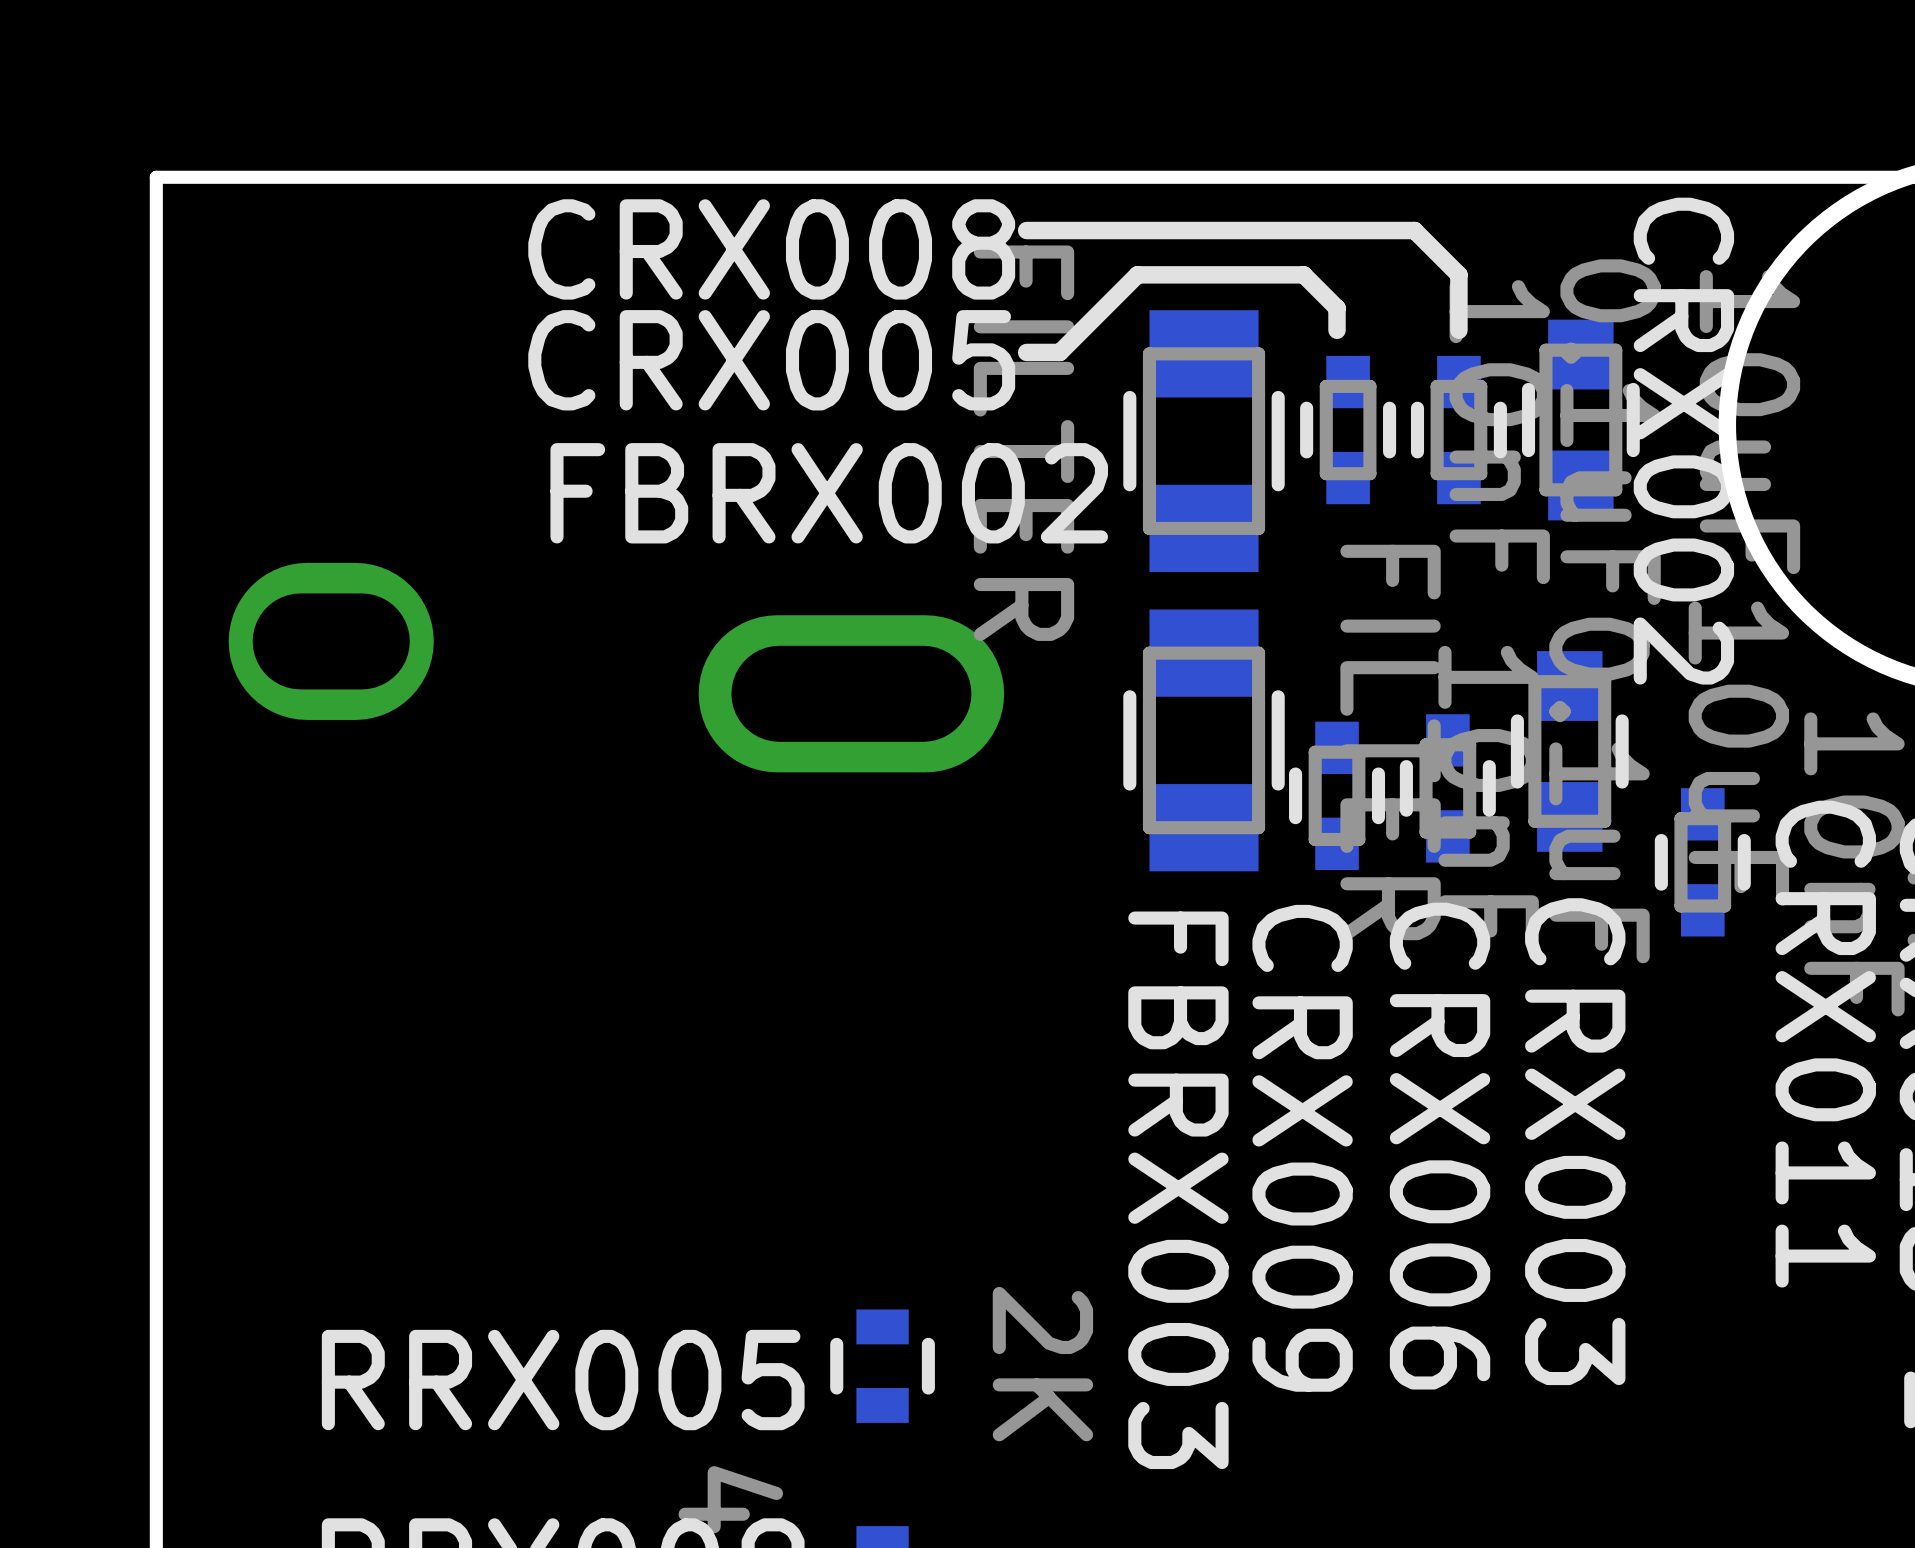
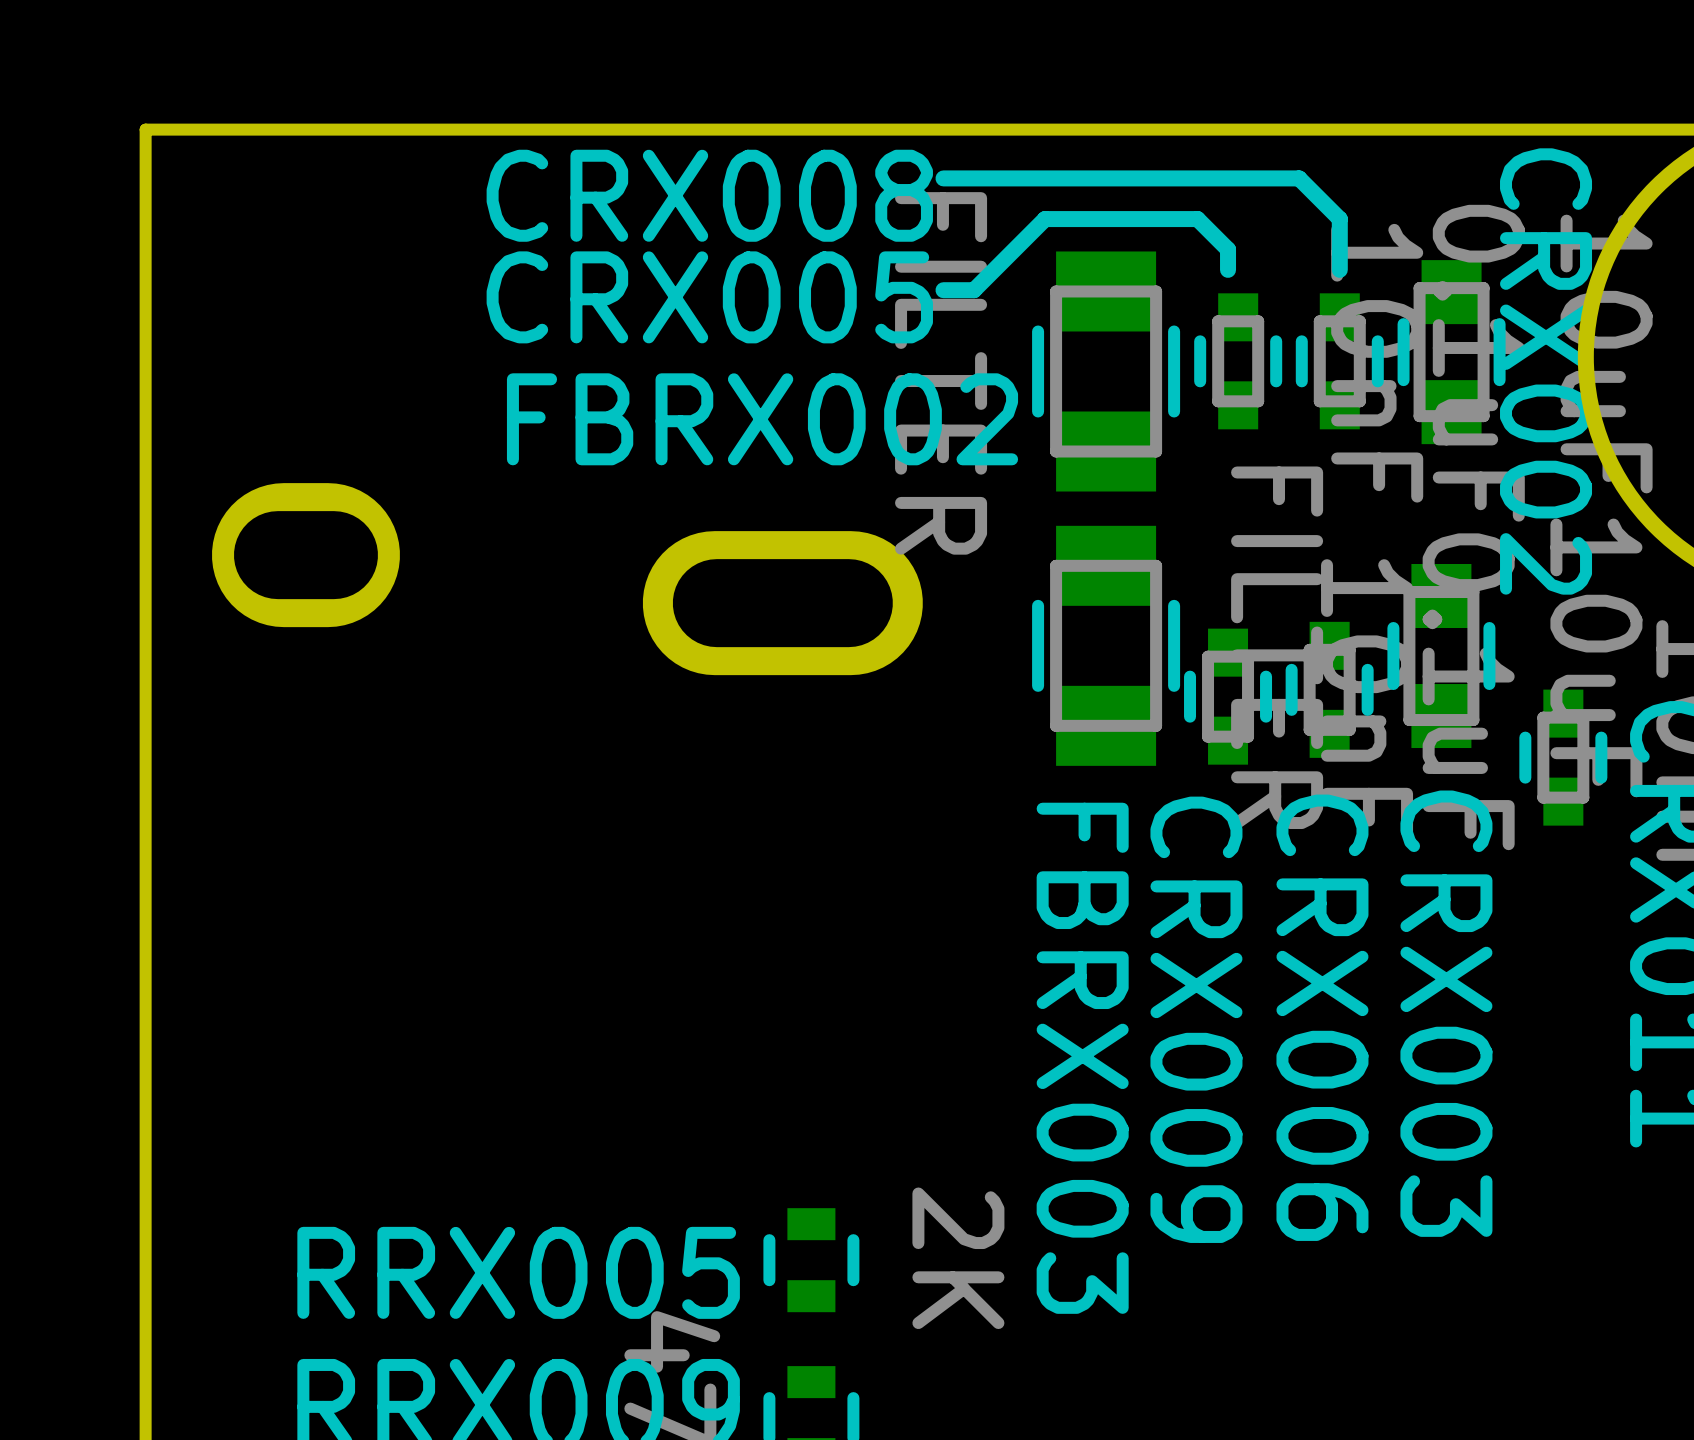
RRX005 position: (882, 1366) -> (811, 1260)

